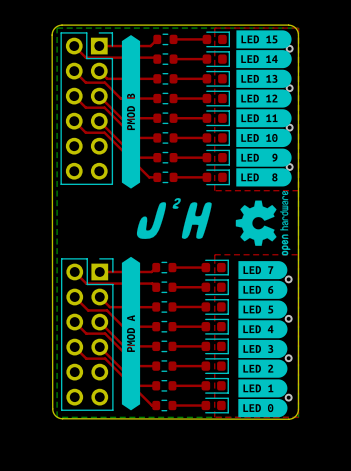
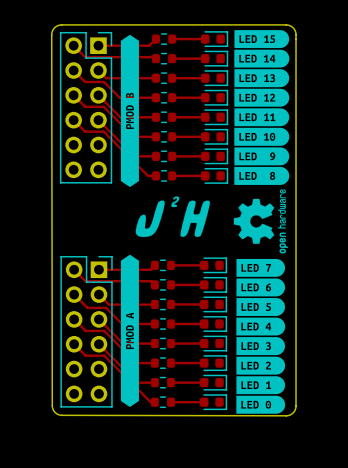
bottom zone outline: (57, 28) (57, 417) (298, 417) (298, 28) (57, 28) -> none
top zone outline: (214, 28) (214, 190) (298, 190) (298, 28) (214, 28) -> none
via: (289, 48) -> none
via: (289, 88) -> none
via: (289, 127) -> none
via: (289, 167) -> none
top zone outline: (214, 254) (214, 417) (298, 417) (298, 254) (214, 254) -> none
via: (288, 279) -> none
via: (288, 318) -> none
via: (288, 358) -> none
via: (288, 397) -> none

